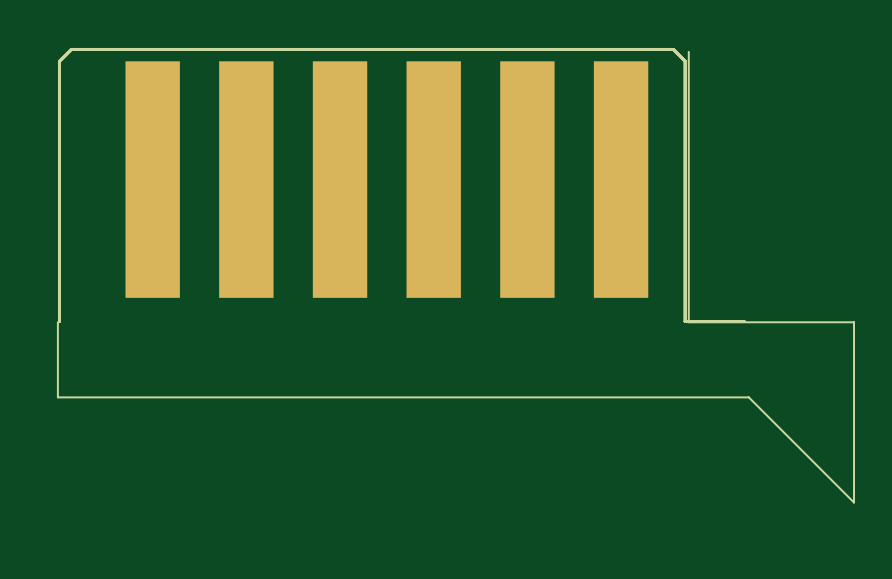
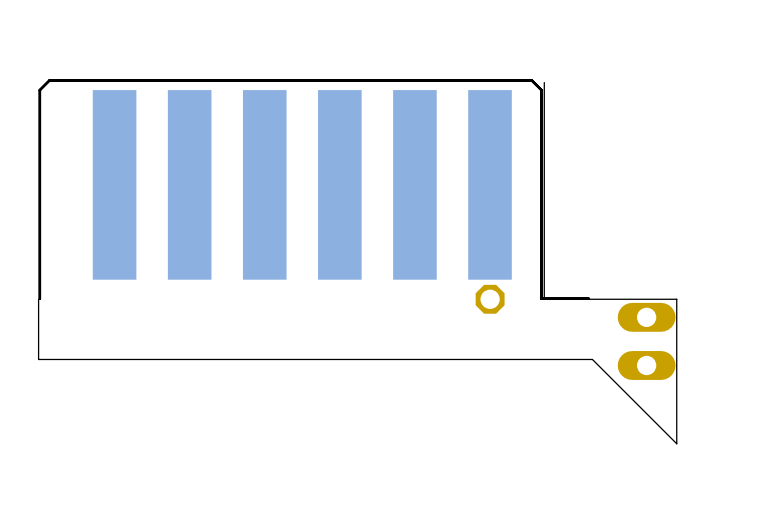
part: none -> (490, 299)
part: none -> (646, 341)

